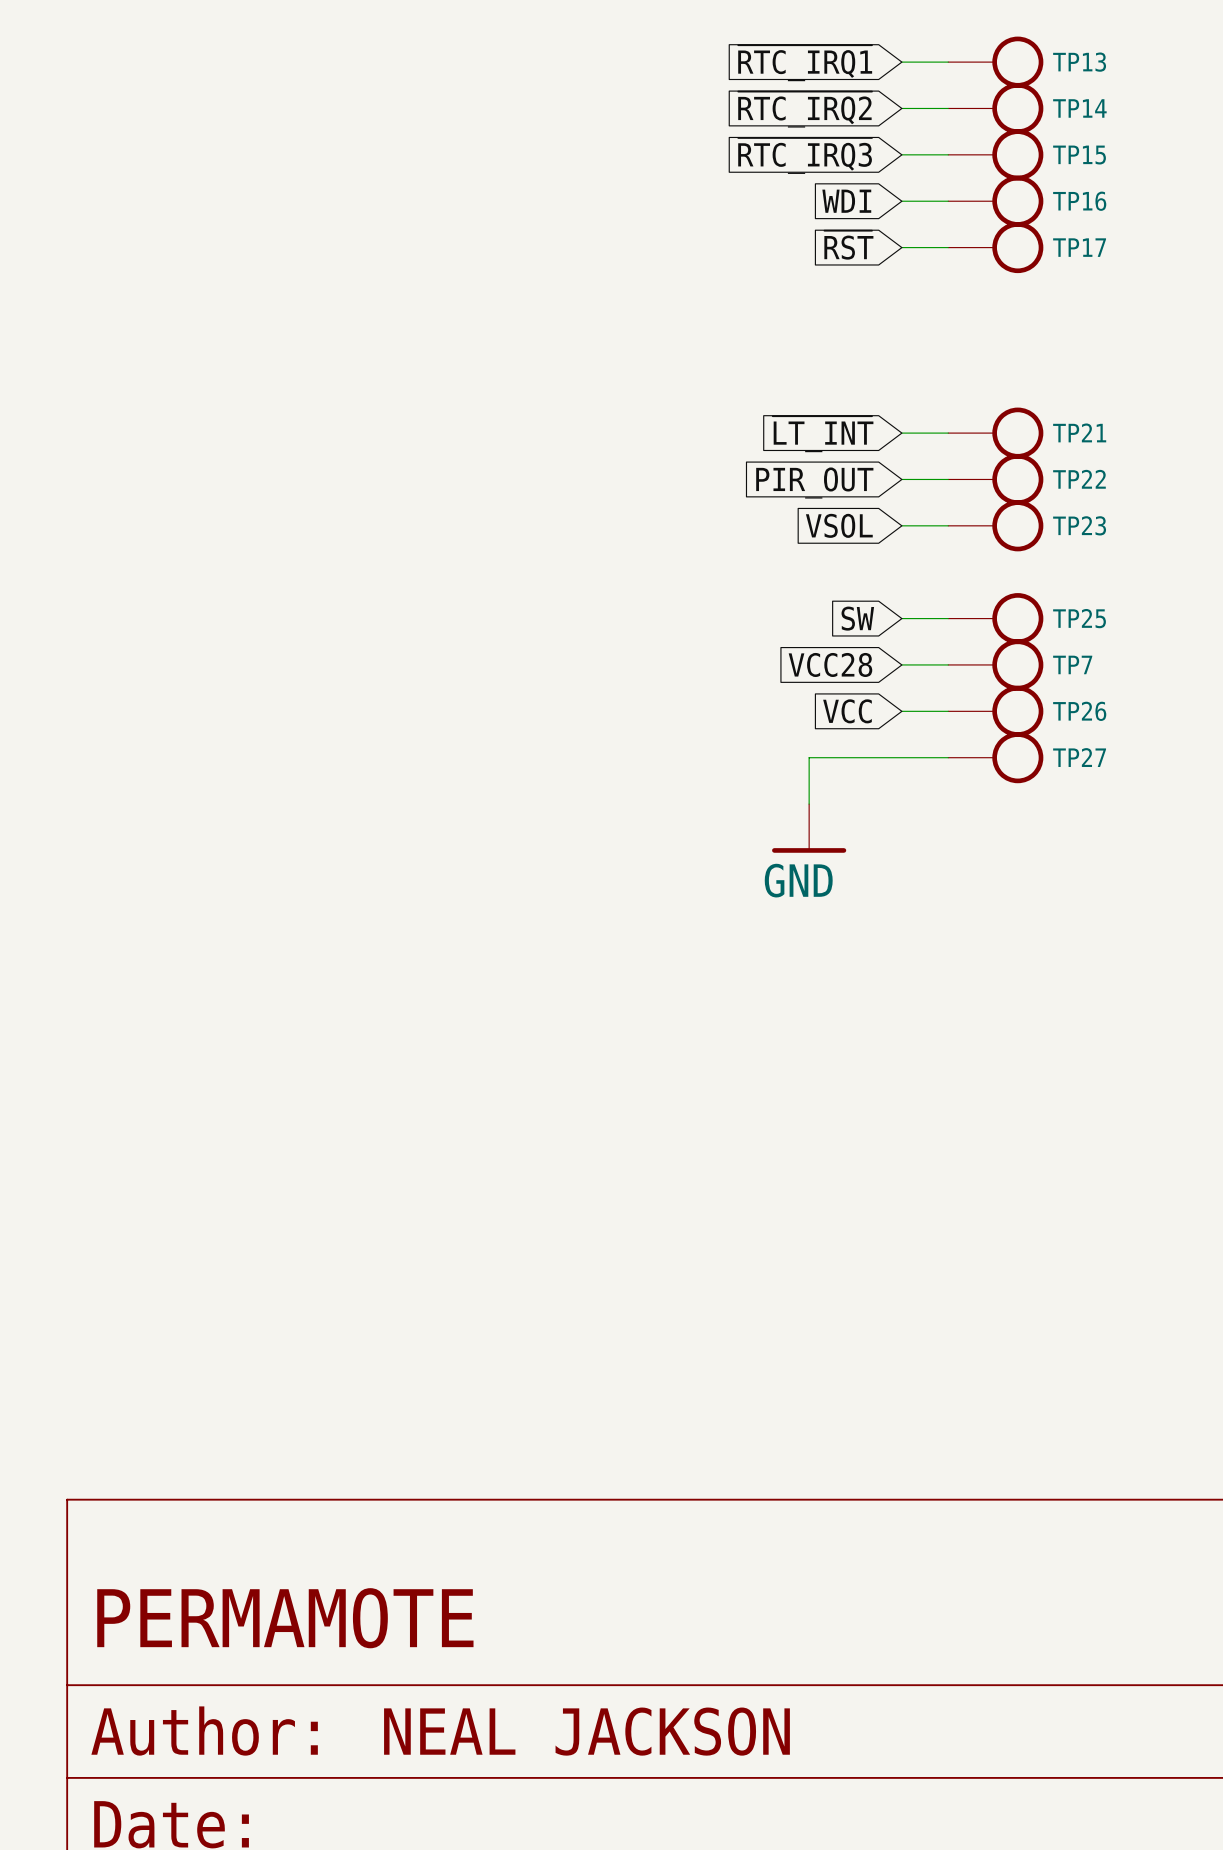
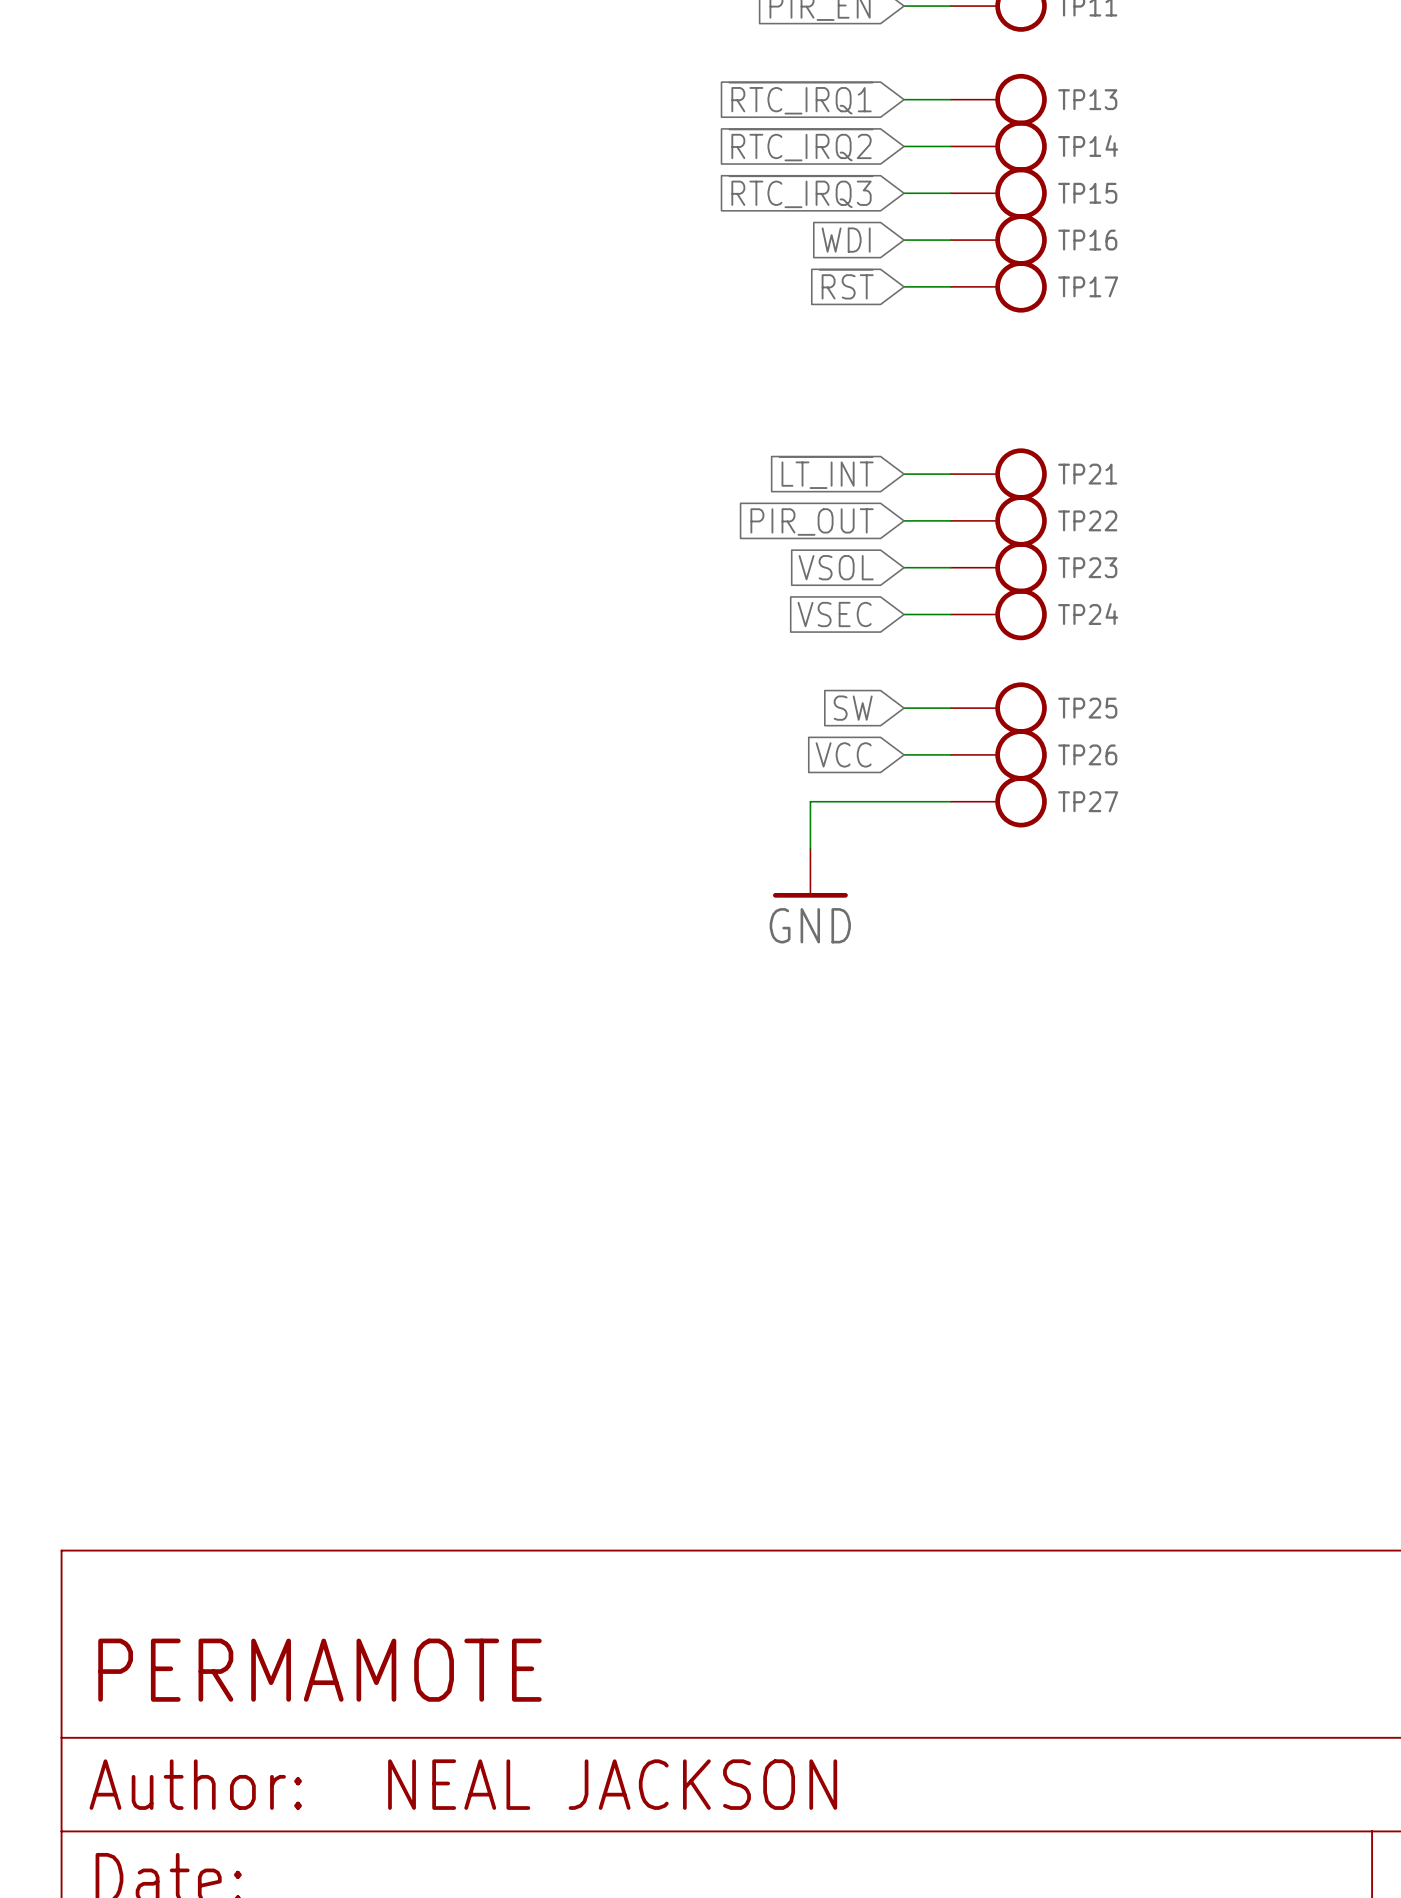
global label: none -> VSEC (834, 614)
TP24: none -> (998, 614)
global label: SW (857, 618) -> none
wire: (901, 618) (948, 618) -> (904, 614) (950, 614)
TP25: (995, 618) -> none
global label: VCC28 (830, 664) -> SW (853, 708)
TP7 name: TP7 (1072, 664) -> TP25 (1087, 708)

